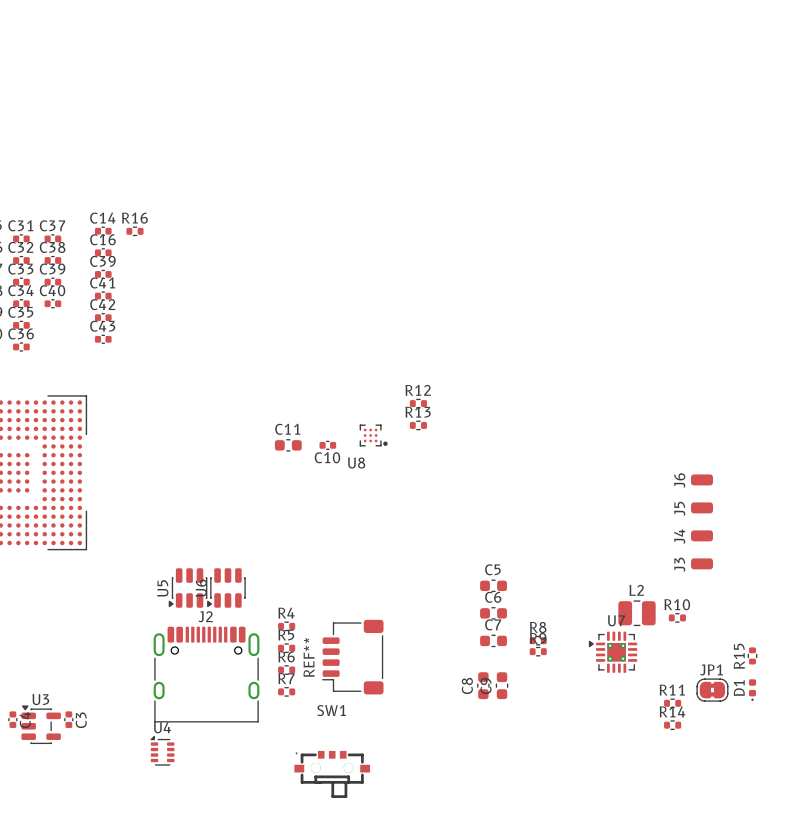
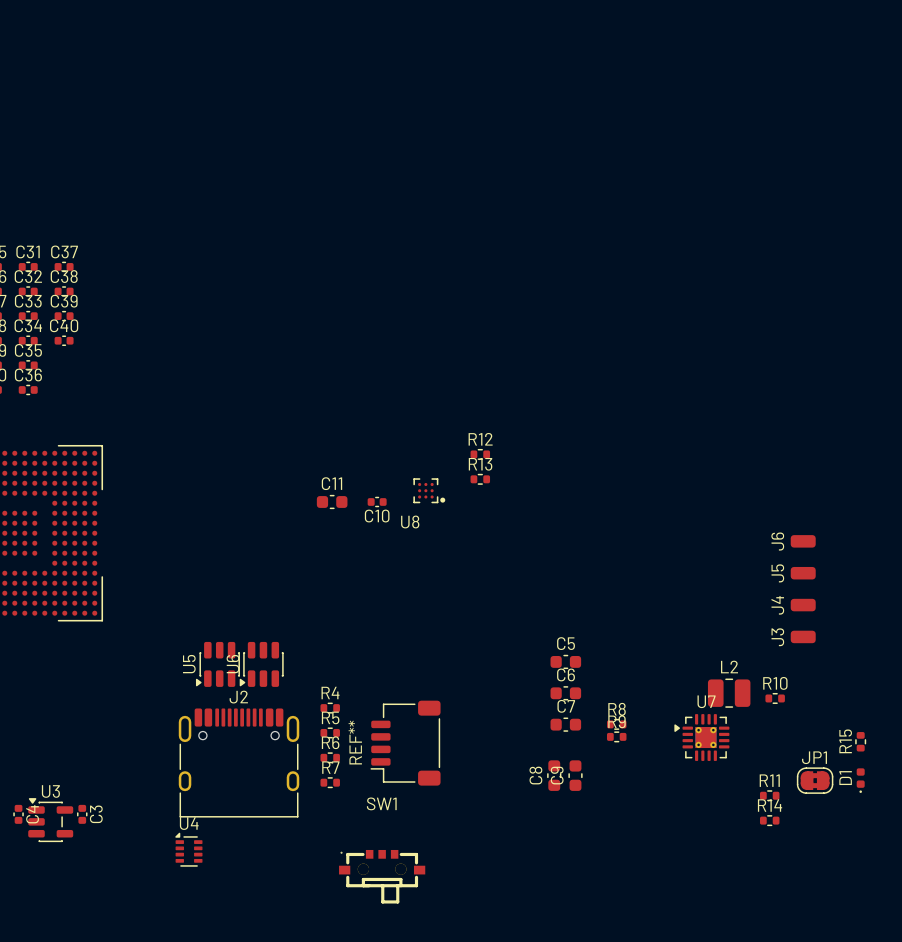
C14: (103, 231) -> none
R16: (134, 231) -> none
C16: (103, 252) -> none
C39: (103, 274) -> none
C41: (103, 296) -> none
C42: (103, 317) -> none
C43: (103, 339) -> none

